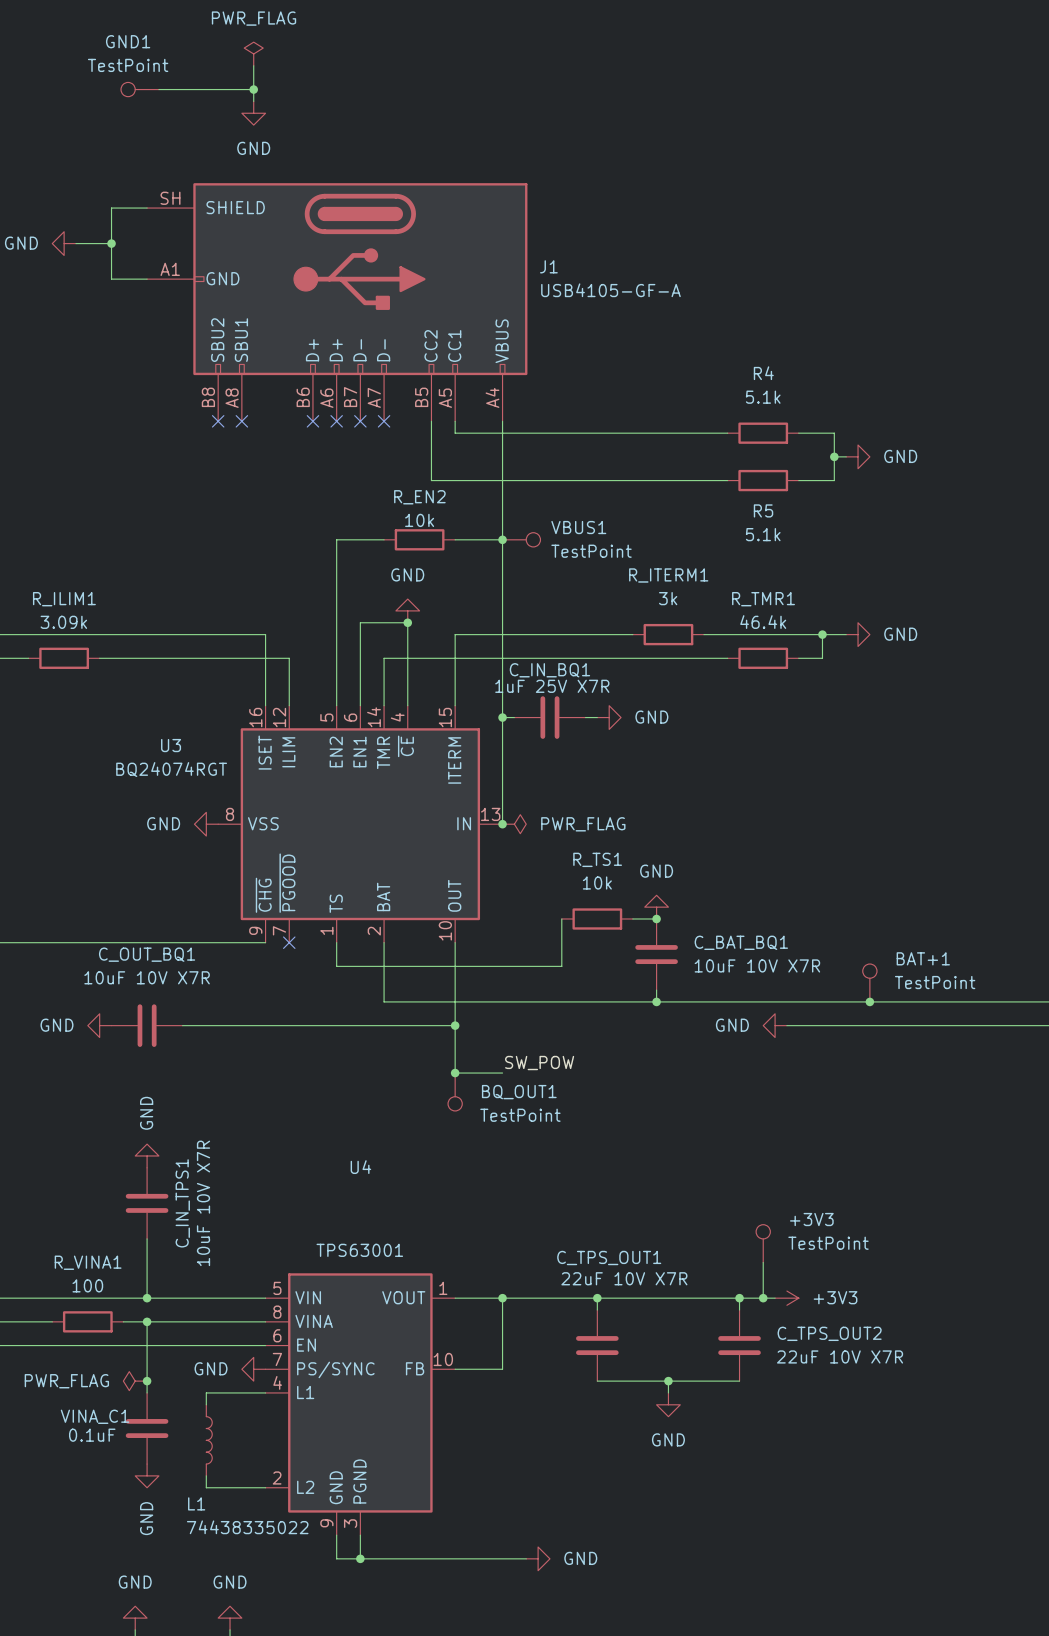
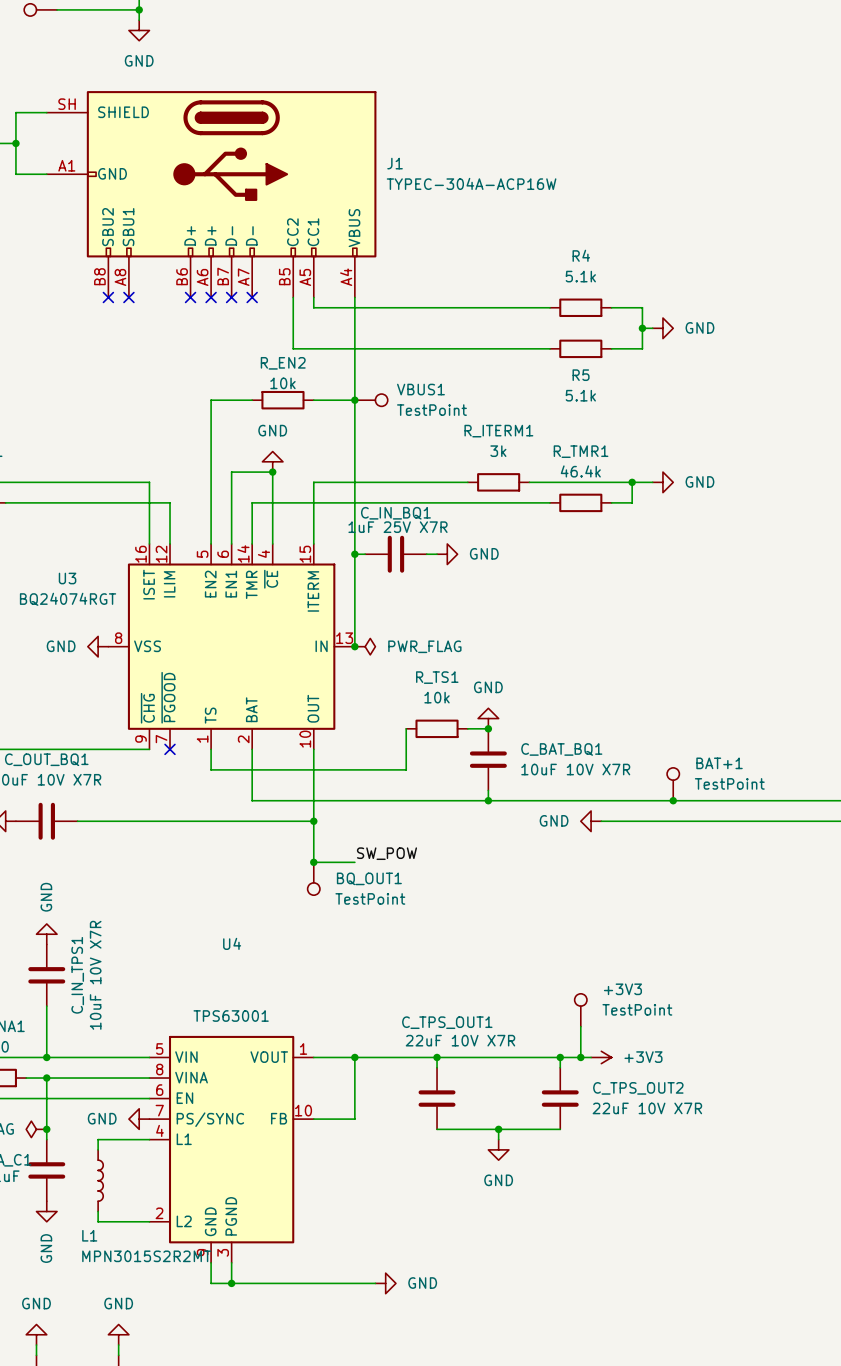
J1 value: USB4105-GF-A (610, 290) -> TYPEC-304A-ACP16W (471, 183)
L1 value: 74438335022 (247, 1527) -> MPN3015S2R2MT (146, 1256)

